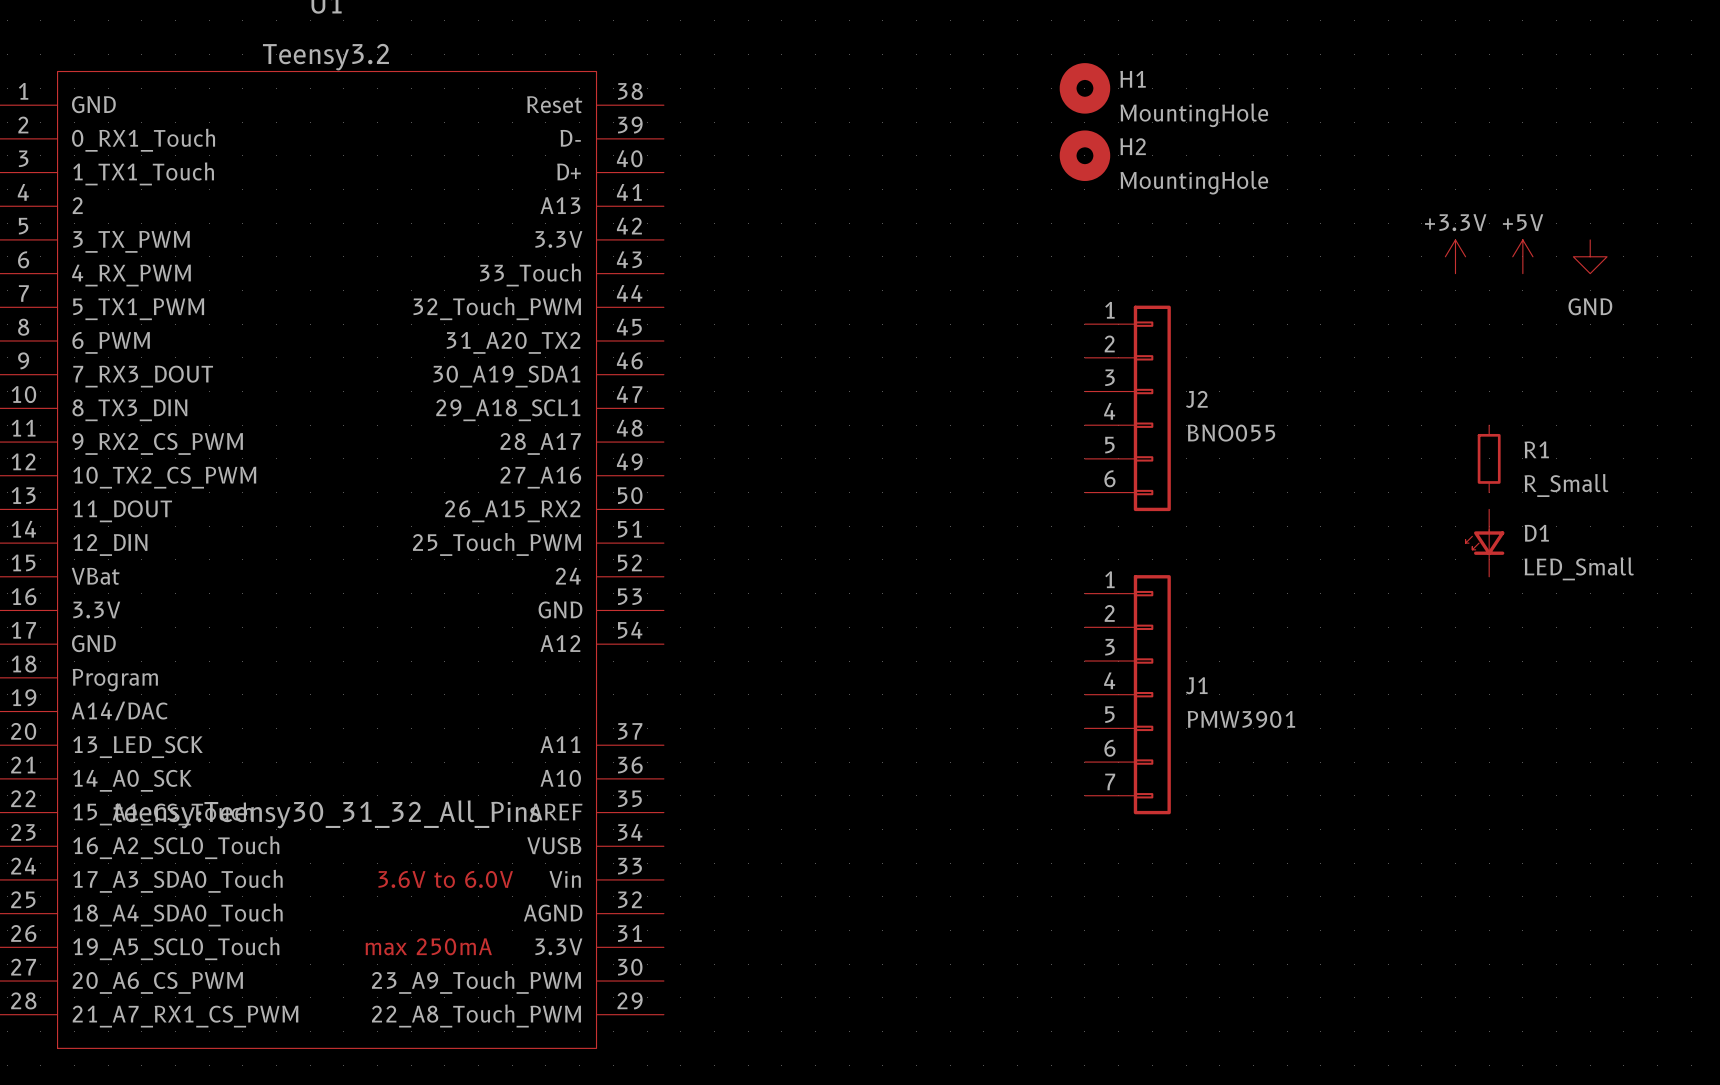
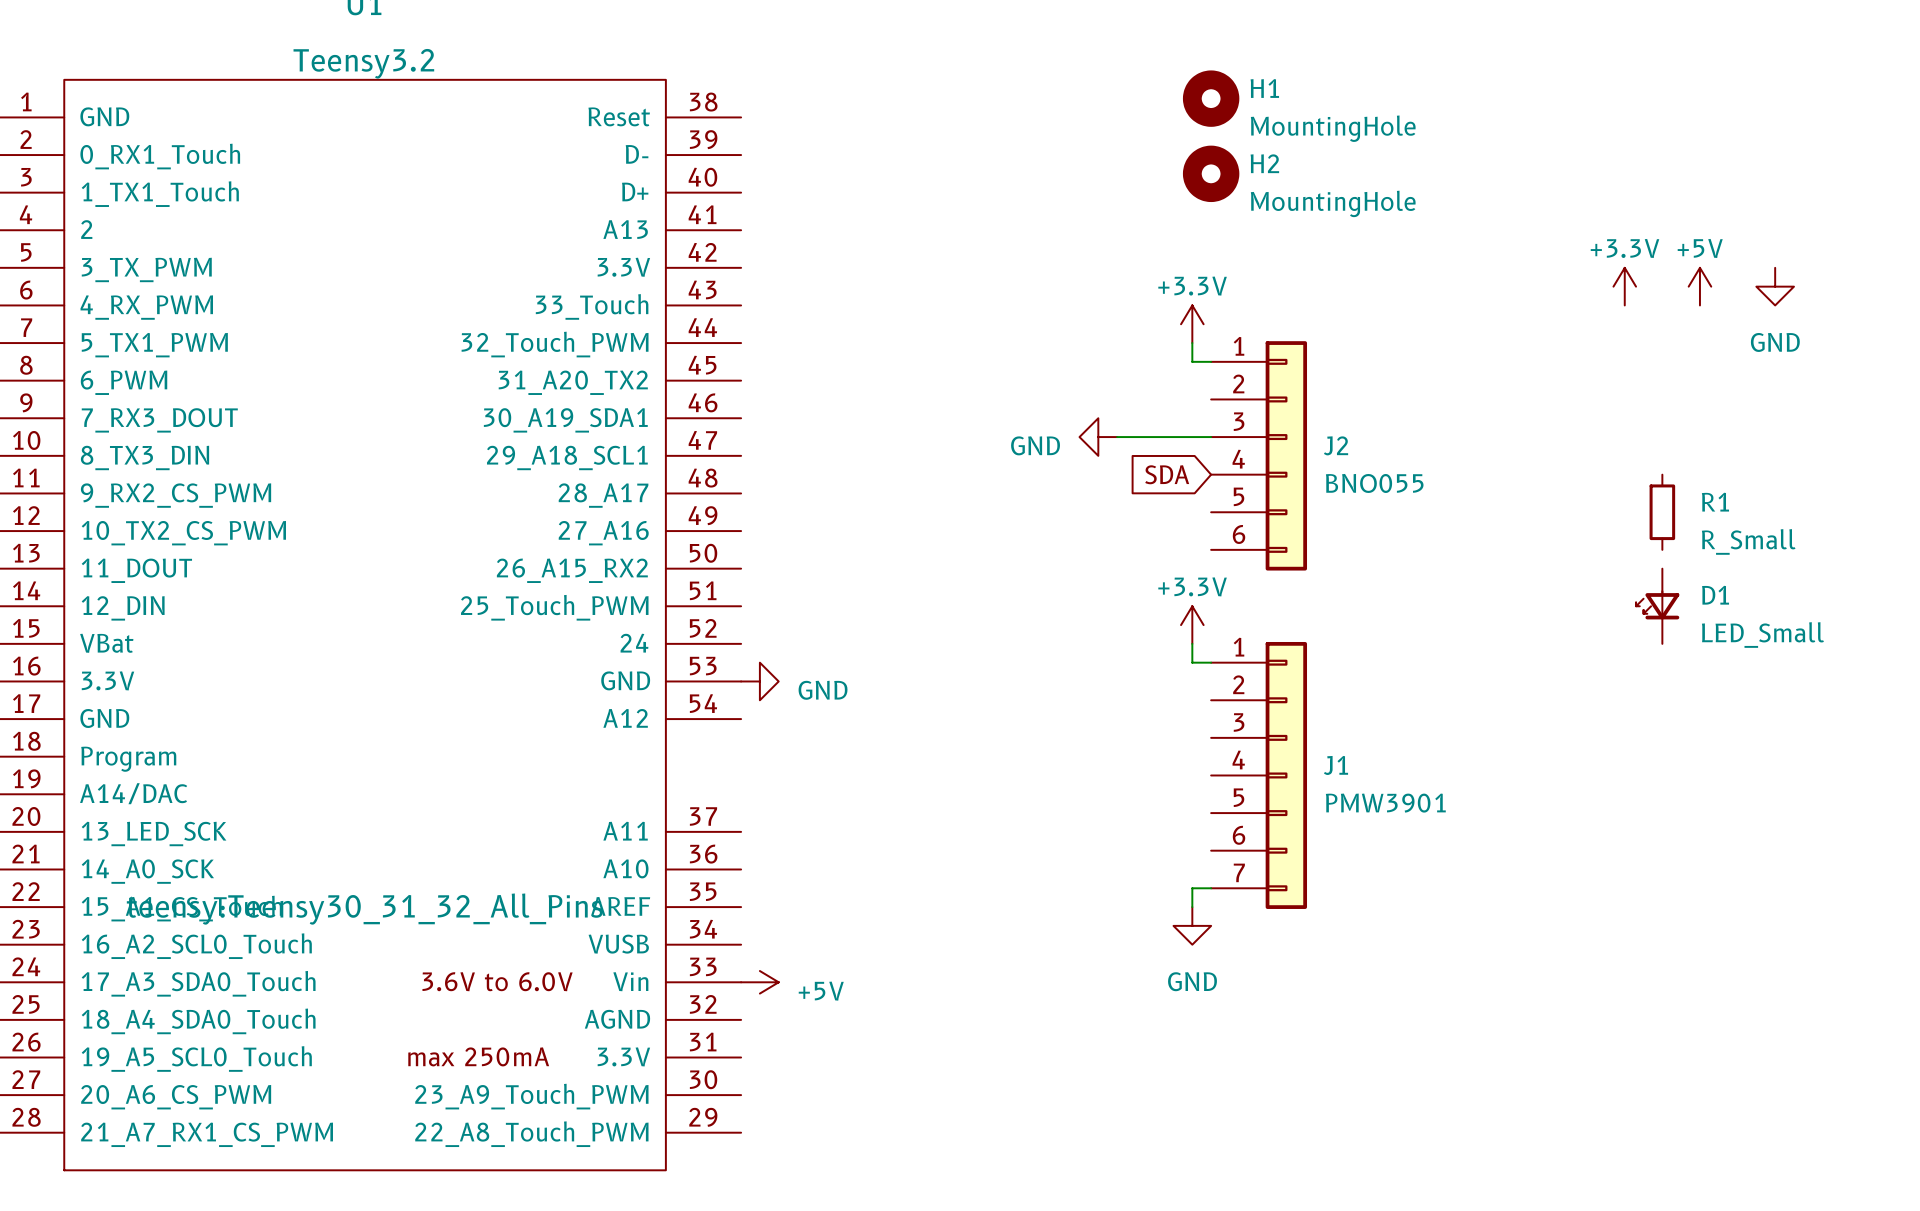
power symbol: none -> +3.3V (1192, 324)
wire: none -> (1192, 343) (1192, 361) (1211, 361)
power symbol: none -> GND (1098, 437)
wire: none -> (1117, 437) (1211, 437)
global label: none -> SDA (1167, 474)
power symbol: none -> +3.3V (1192, 625)
wire: none -> (1192, 643) (1192, 662) (1211, 662)
power symbol: none -> GND (759, 681)
wire: none -> (1211, 888) (1192, 888) (1192, 907)
power symbol: none -> GND (1192, 925)
power symbol: none -> +5V (759, 982)

